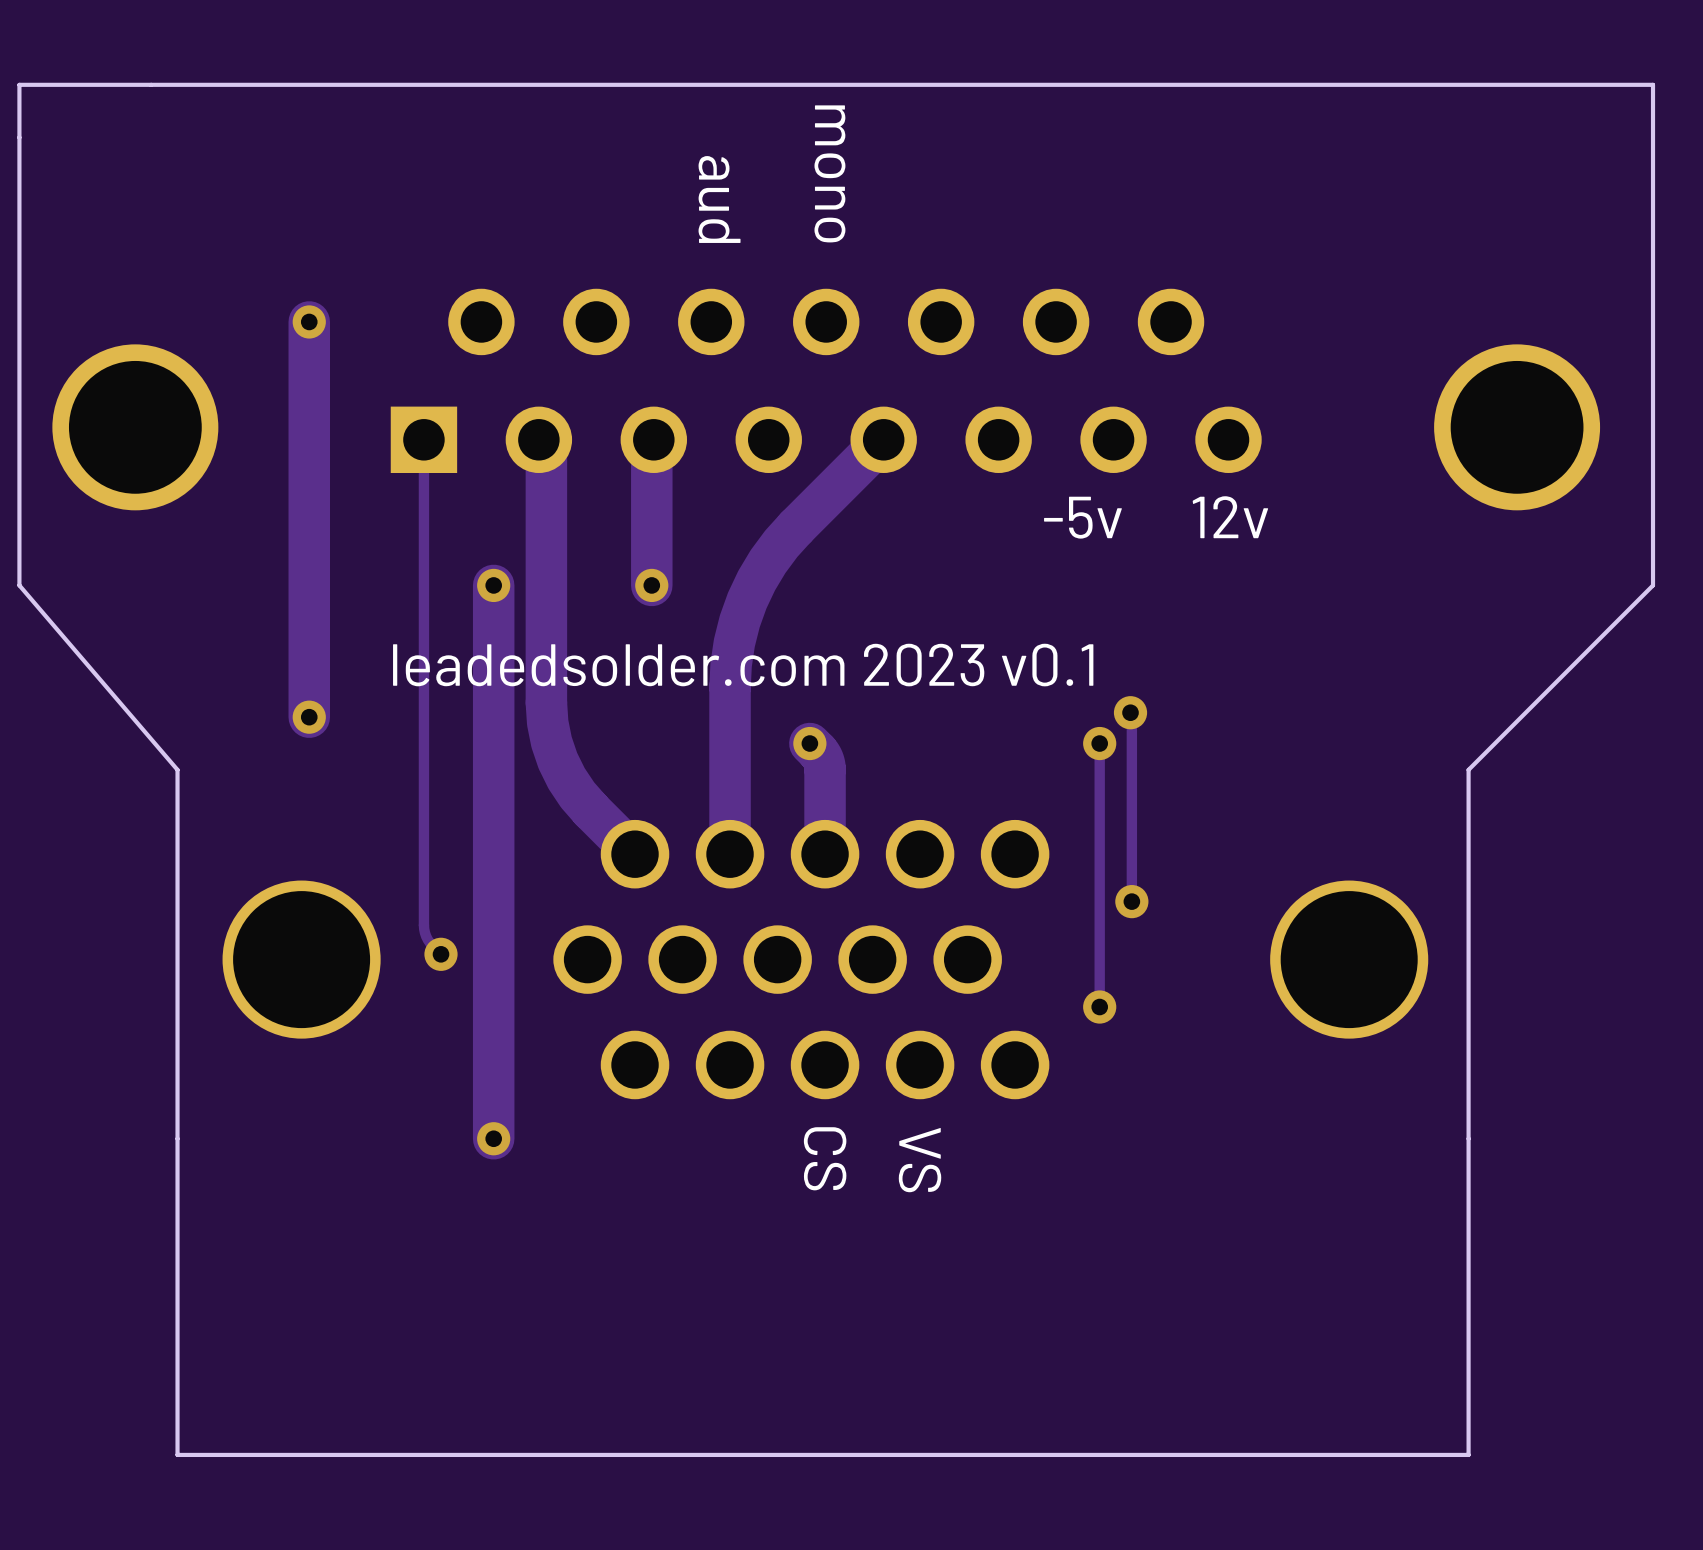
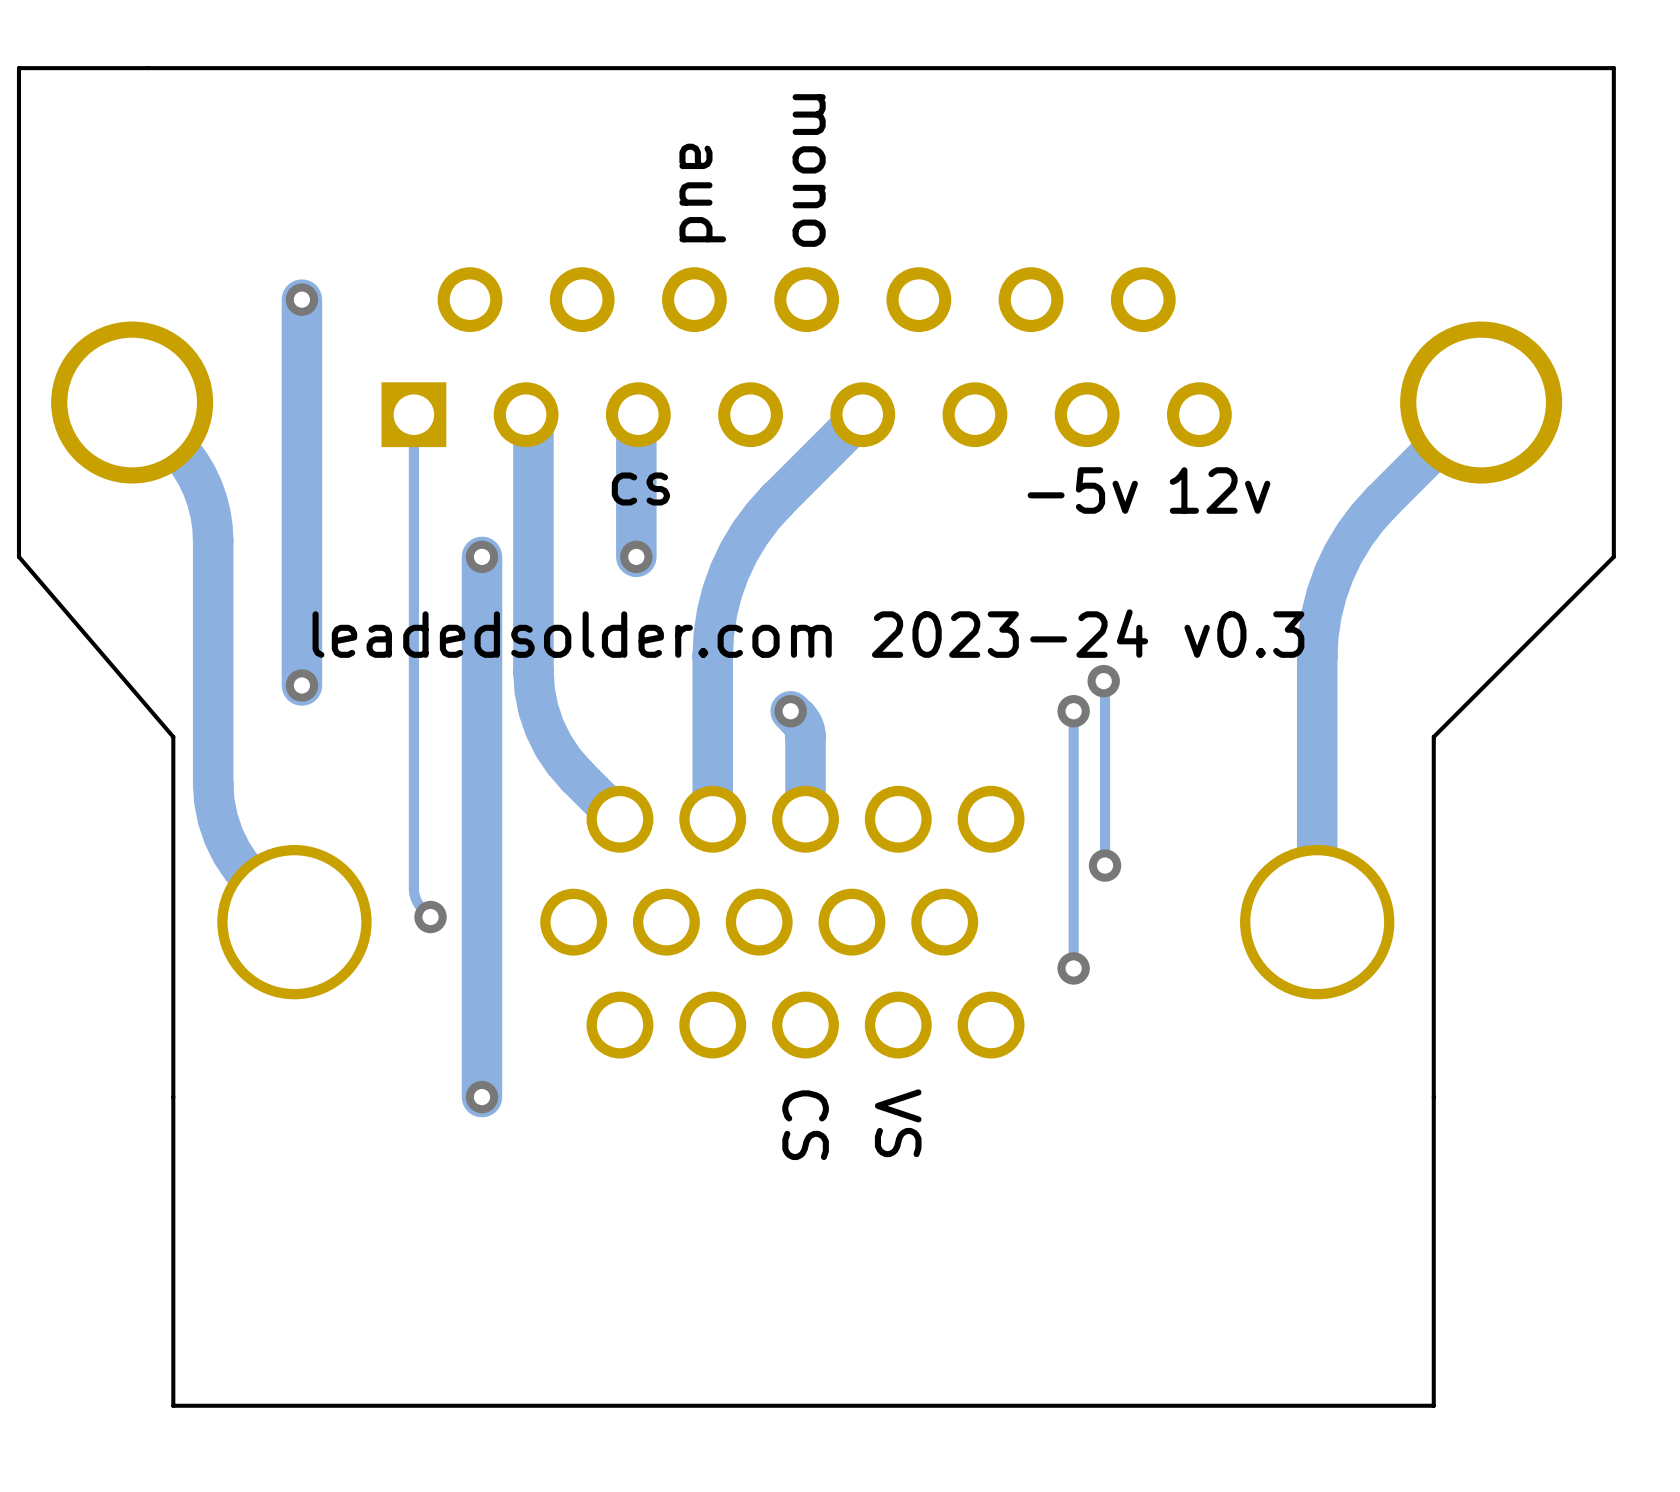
track: none -> (132, 402) (172, 443) (189, 464) (202, 487) (210, 513) (213, 540) (213, 783) (217, 819) (231, 852) (241, 867) (294, 922)
track: none -> (1481, 402) (1367, 517) (1343, 553) (1326, 593) (1321, 614) (1317, 657) (1317, 922)
text: none -> cs (640, 488)
text: leadedsolder.com 2023 v0.1 (743, 665) -> leadedsolder.com 2023-24 v0.3 (808, 633)

